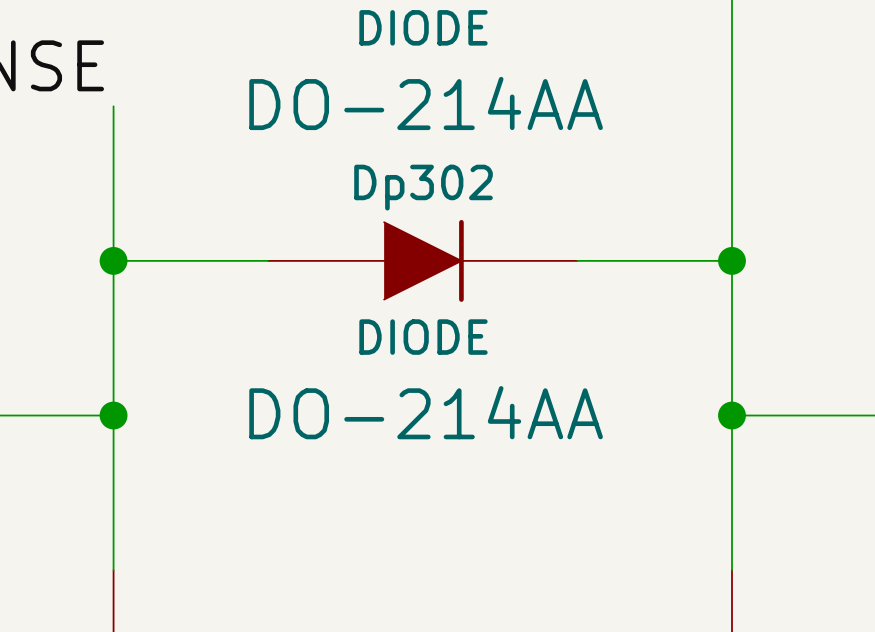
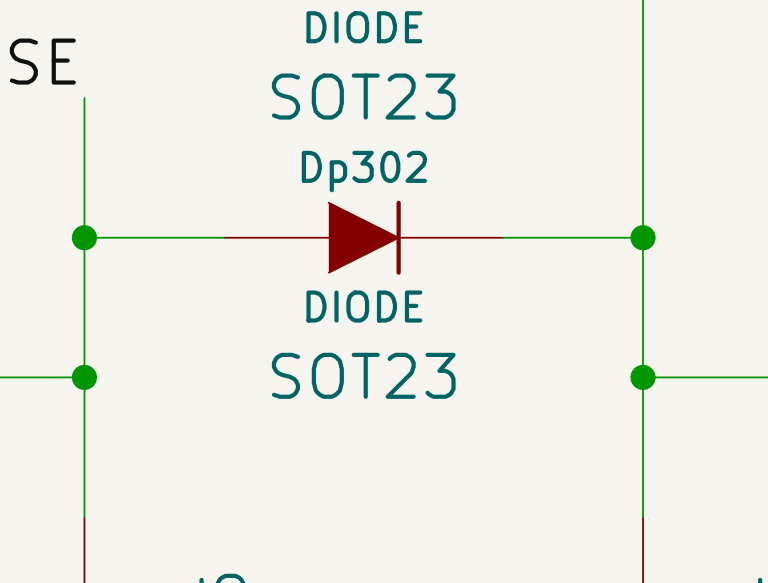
part text: DO-214AA (426, 103) -> SOT23 (363, 96)
Dp302 text: DO-214AA (426, 412) -> SOT23 (363, 375)

